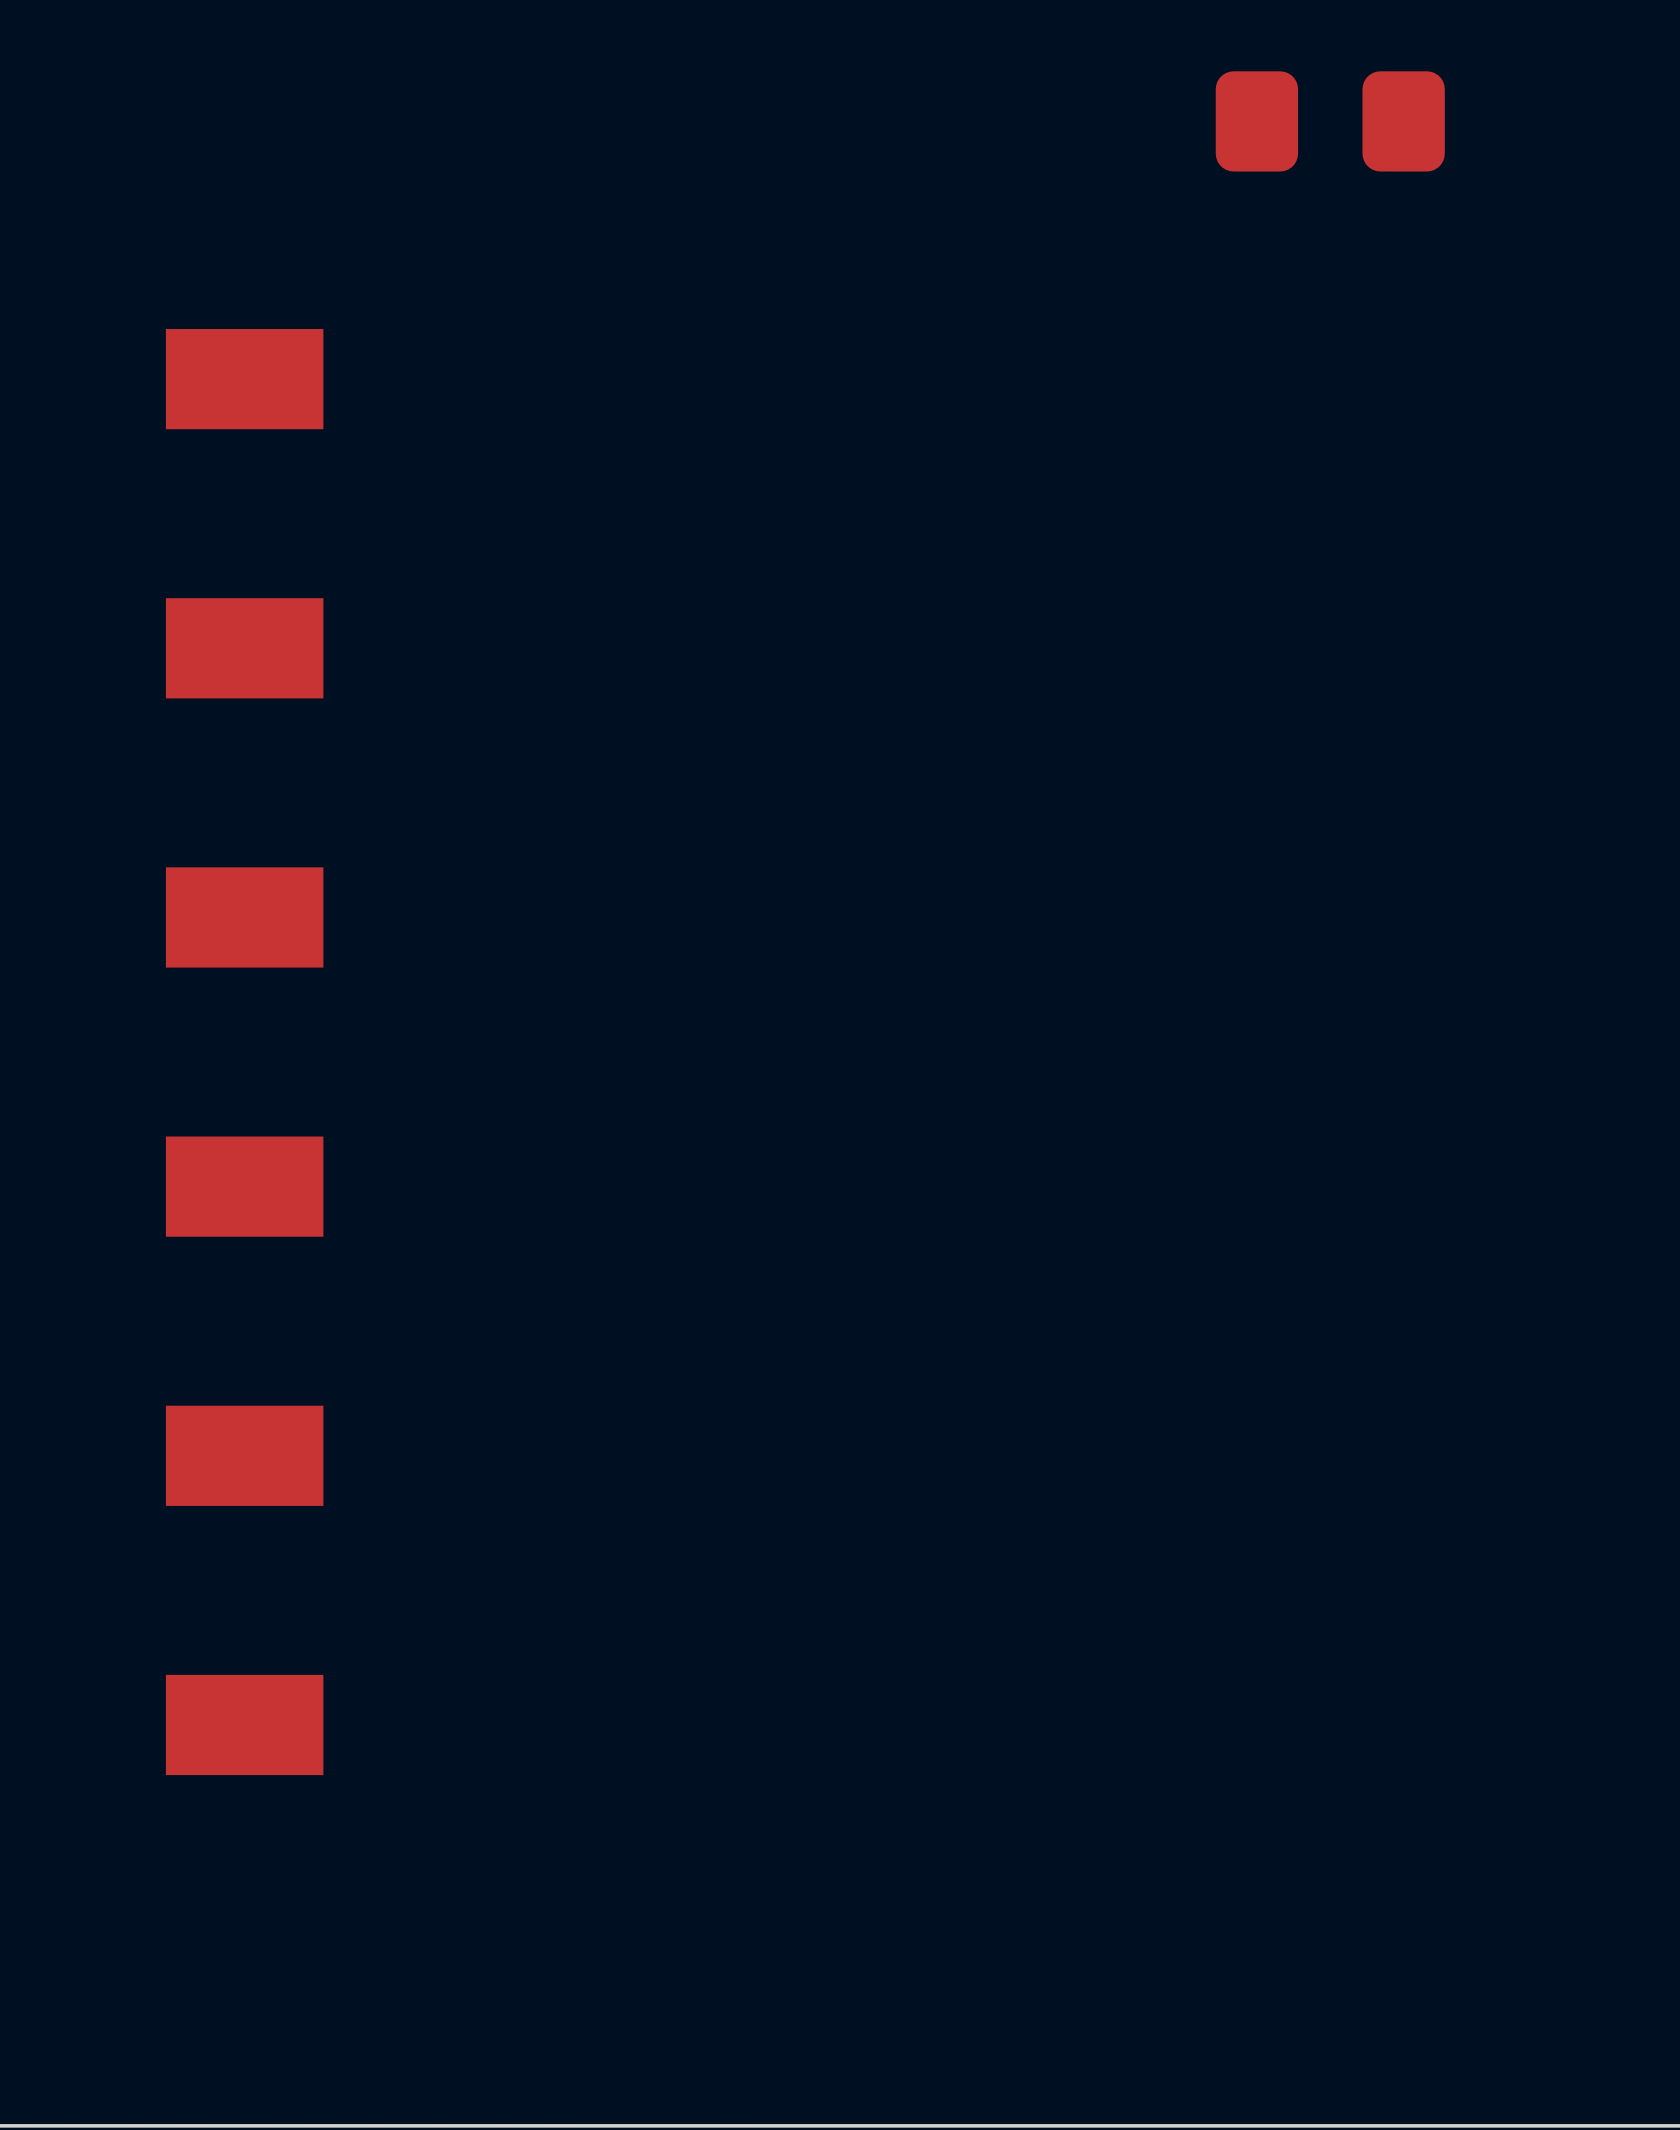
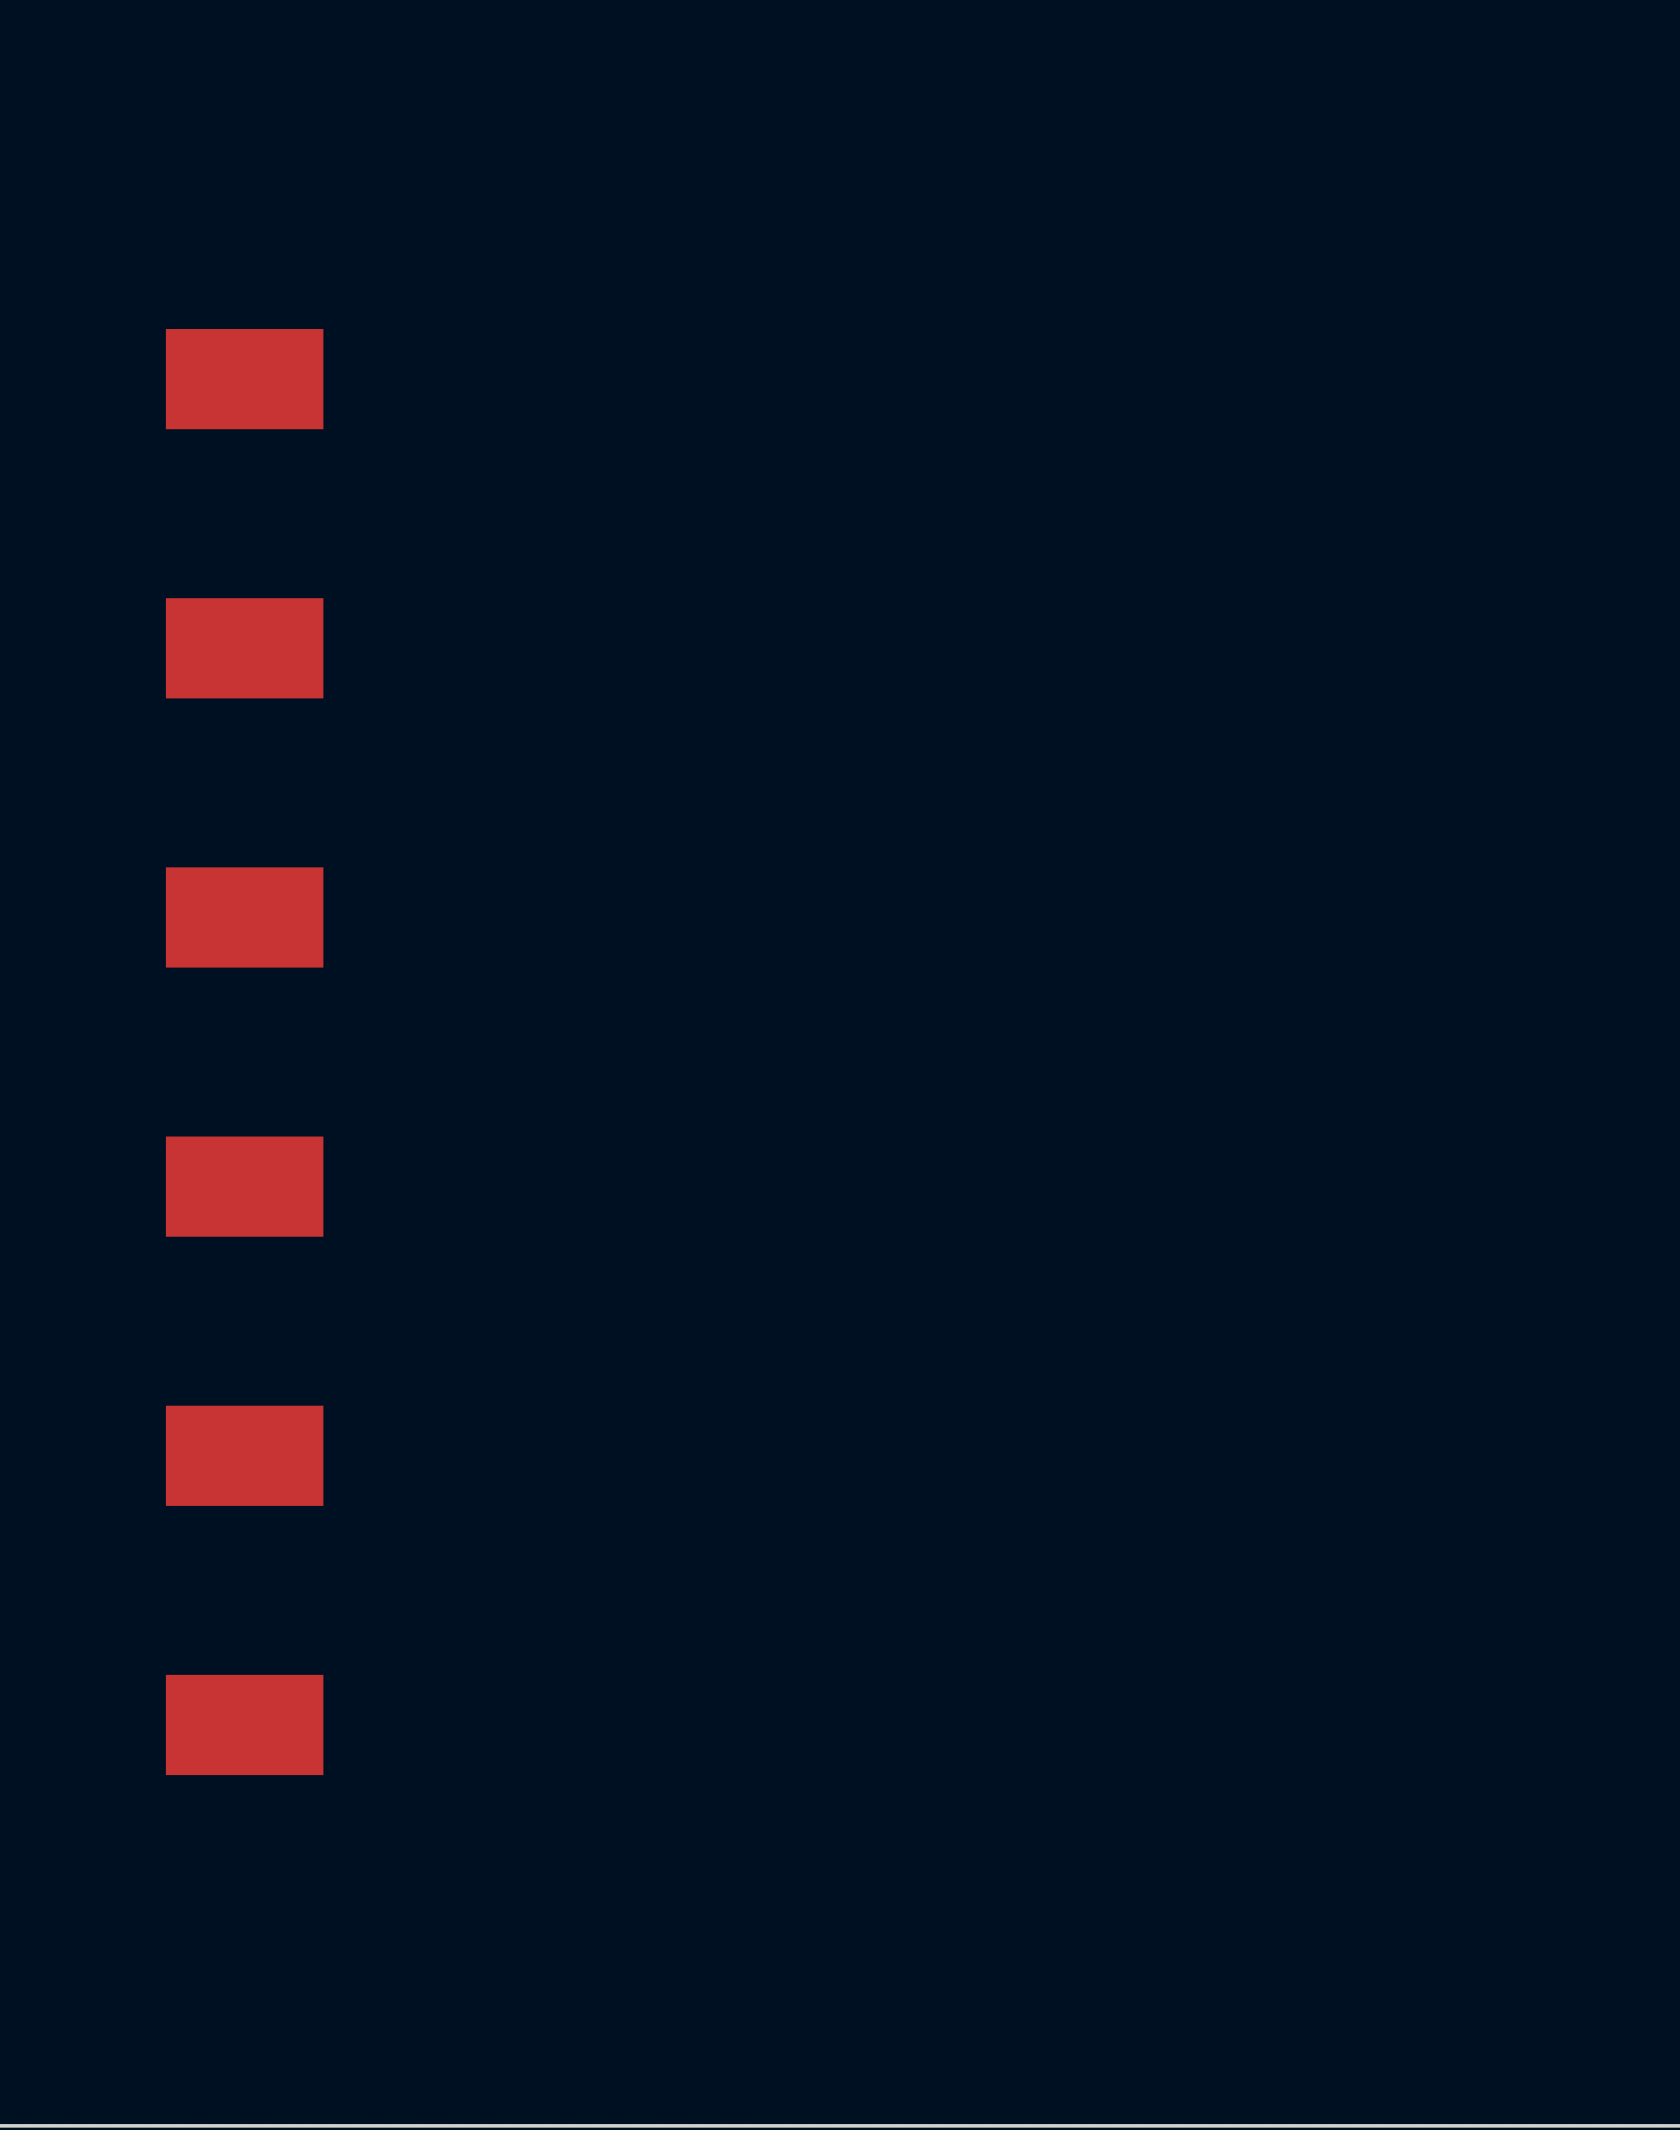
part: (1330, 121) -> none

